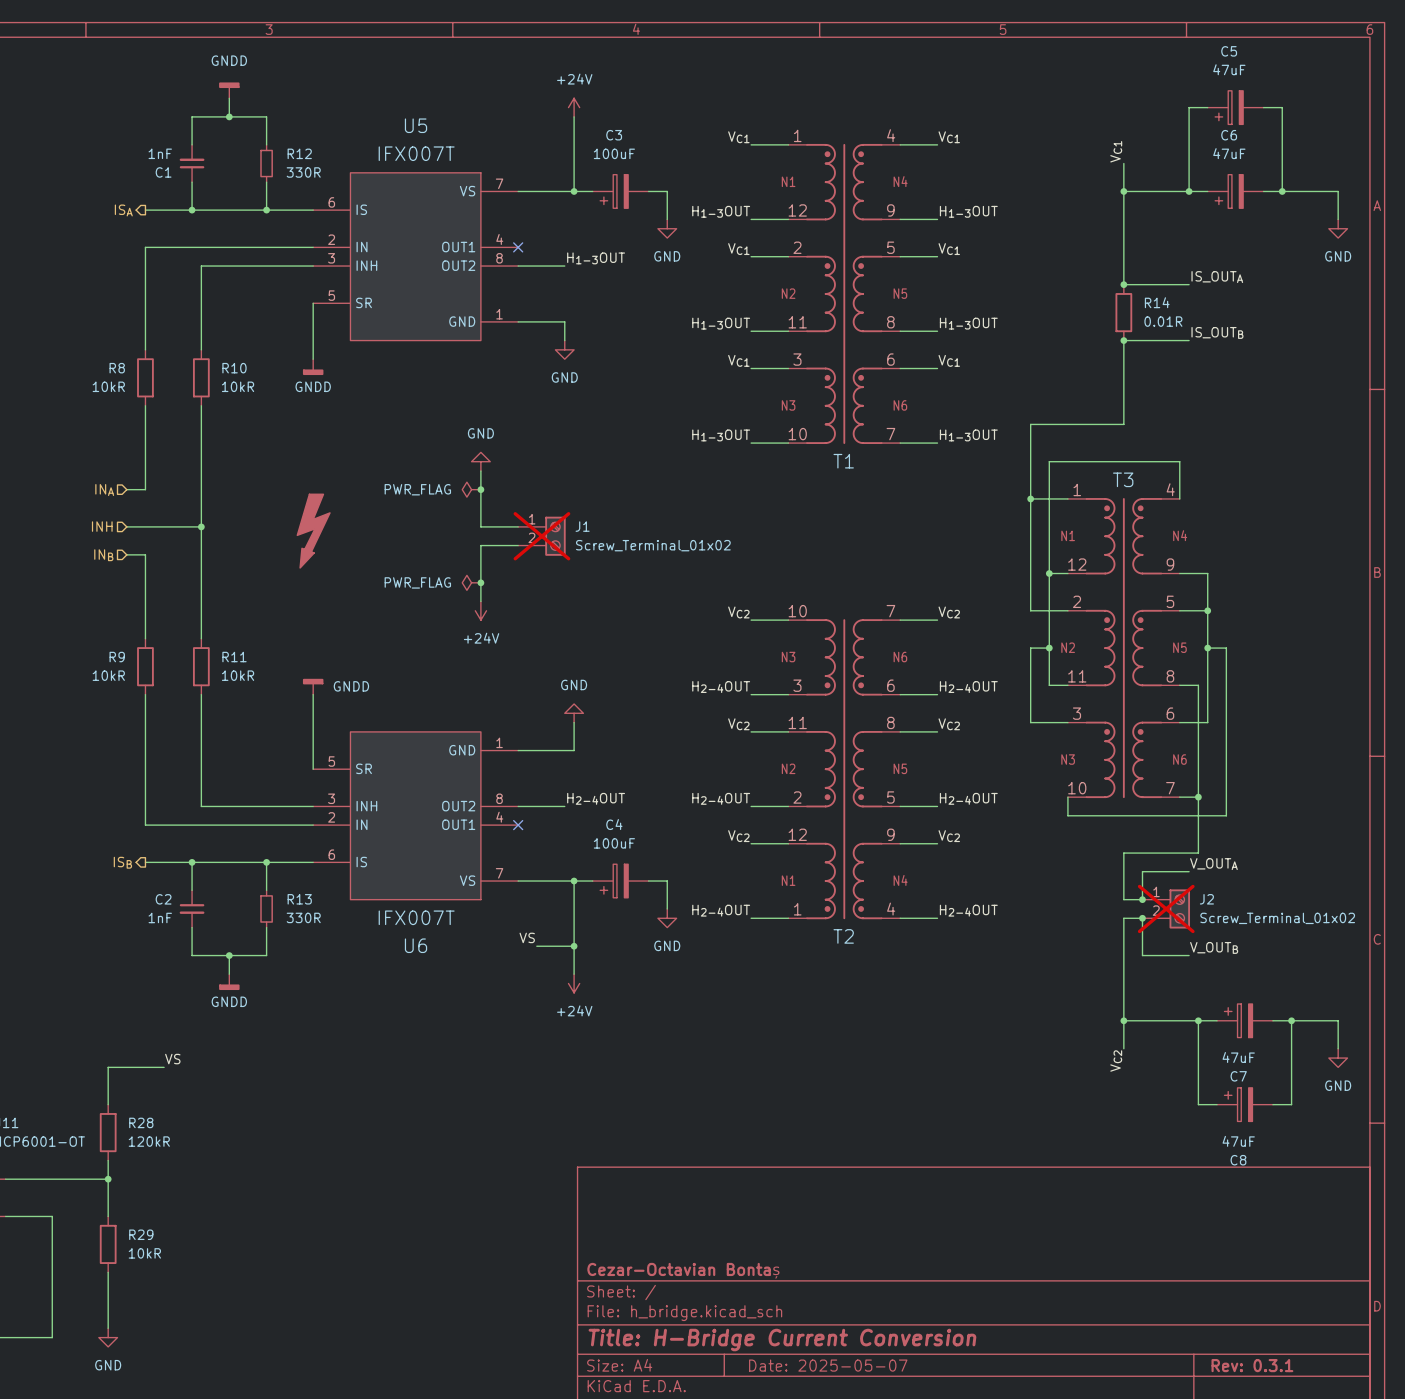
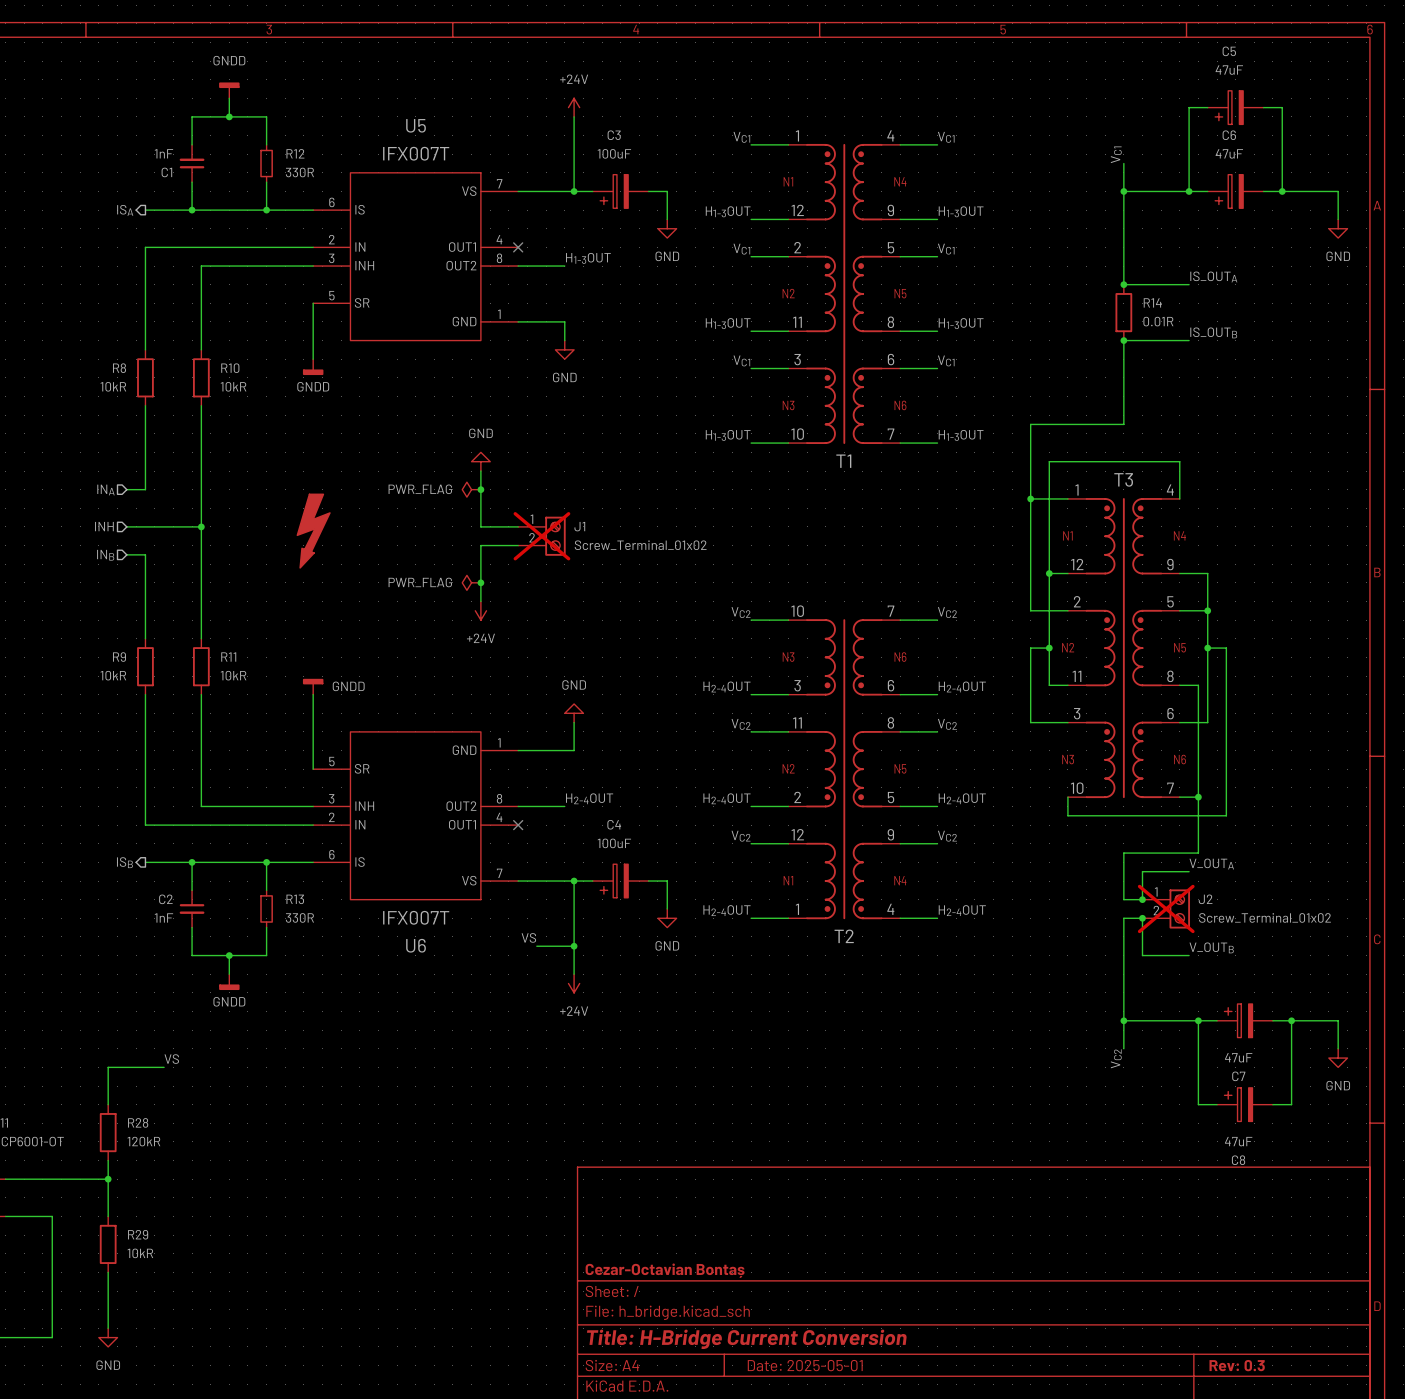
title block: Date: 2025-05-07 (828, 1365) -> Date: 2025-05-01 (805, 1365)
title block: Rev: 0.3.1 (1252, 1365) -> Rev: 0.3 (1237, 1365)

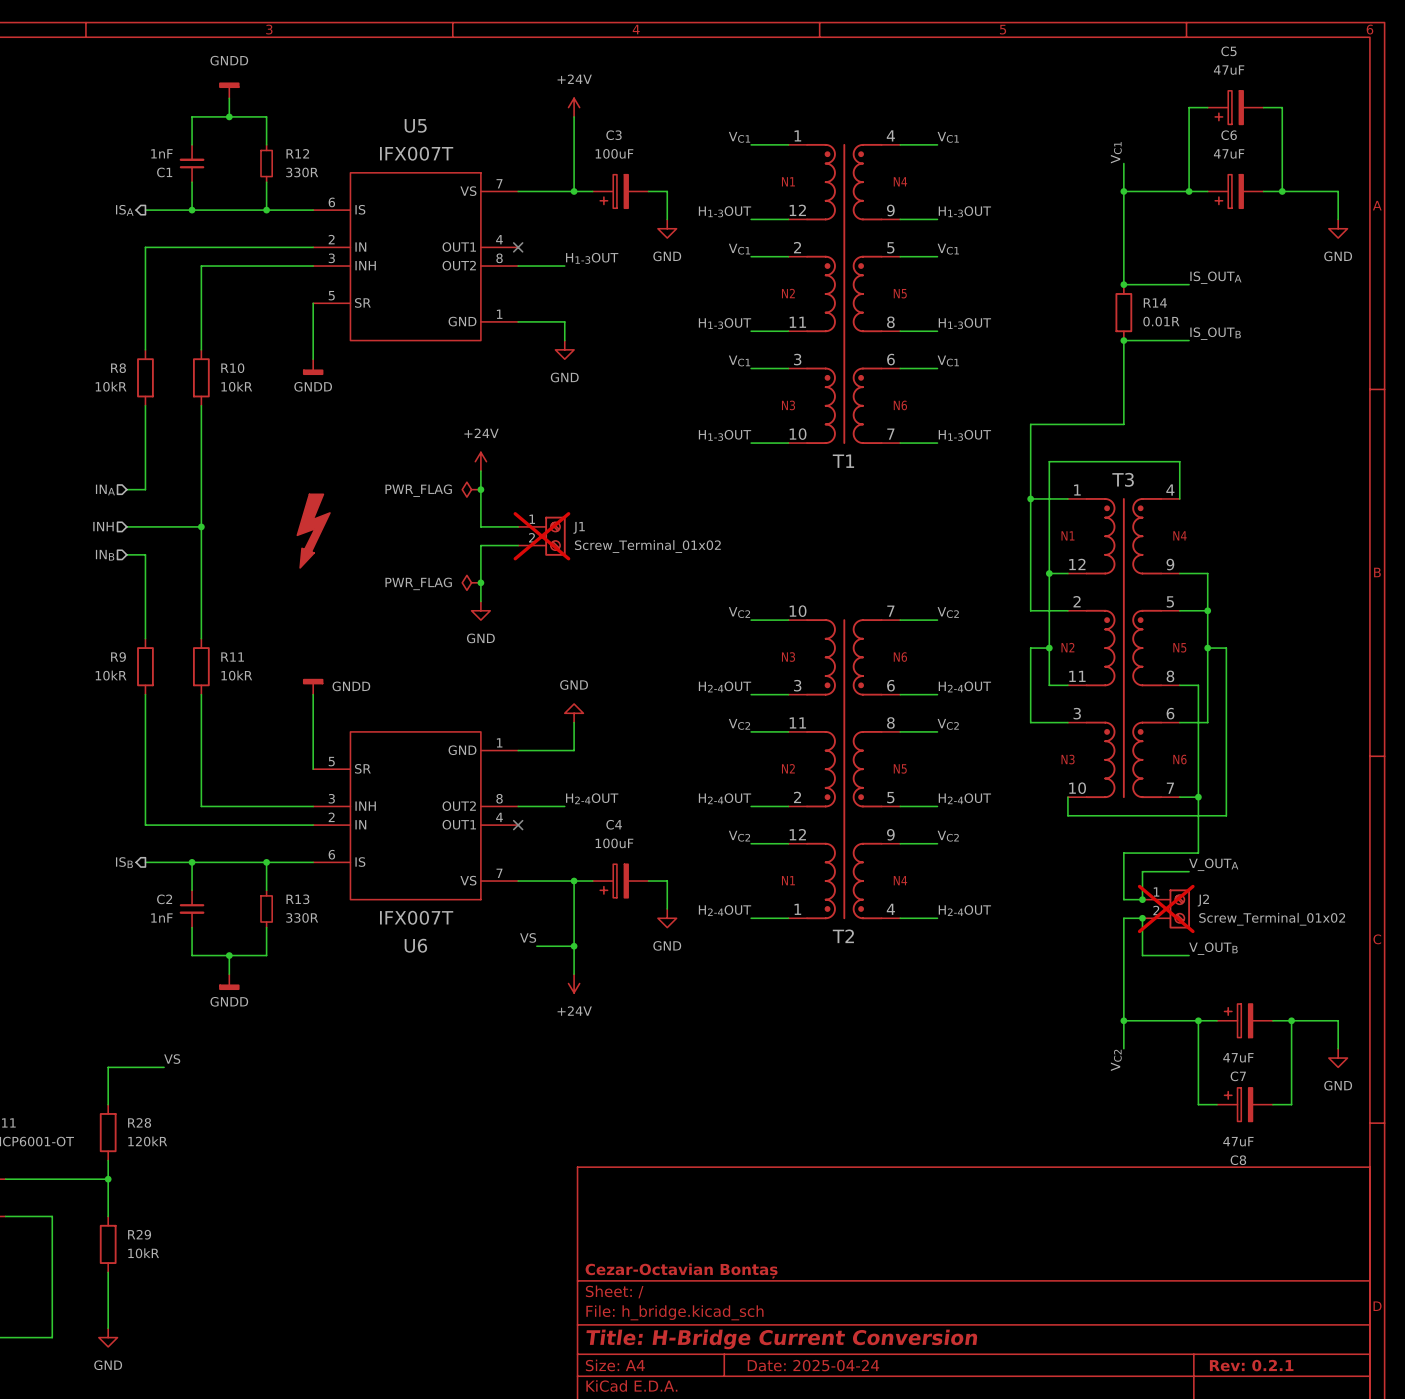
power symbol: GND (480, 461) -> +24V (480, 461)
power symbol: +24V (480, 610) -> GND (480, 610)
title block: Date: 2025-05-01 (805, 1365) -> Date: 2025-04-24 (813, 1365)
title block: Rev: 0.3 (1237, 1365) -> Rev: 0.2.1 (1251, 1365)

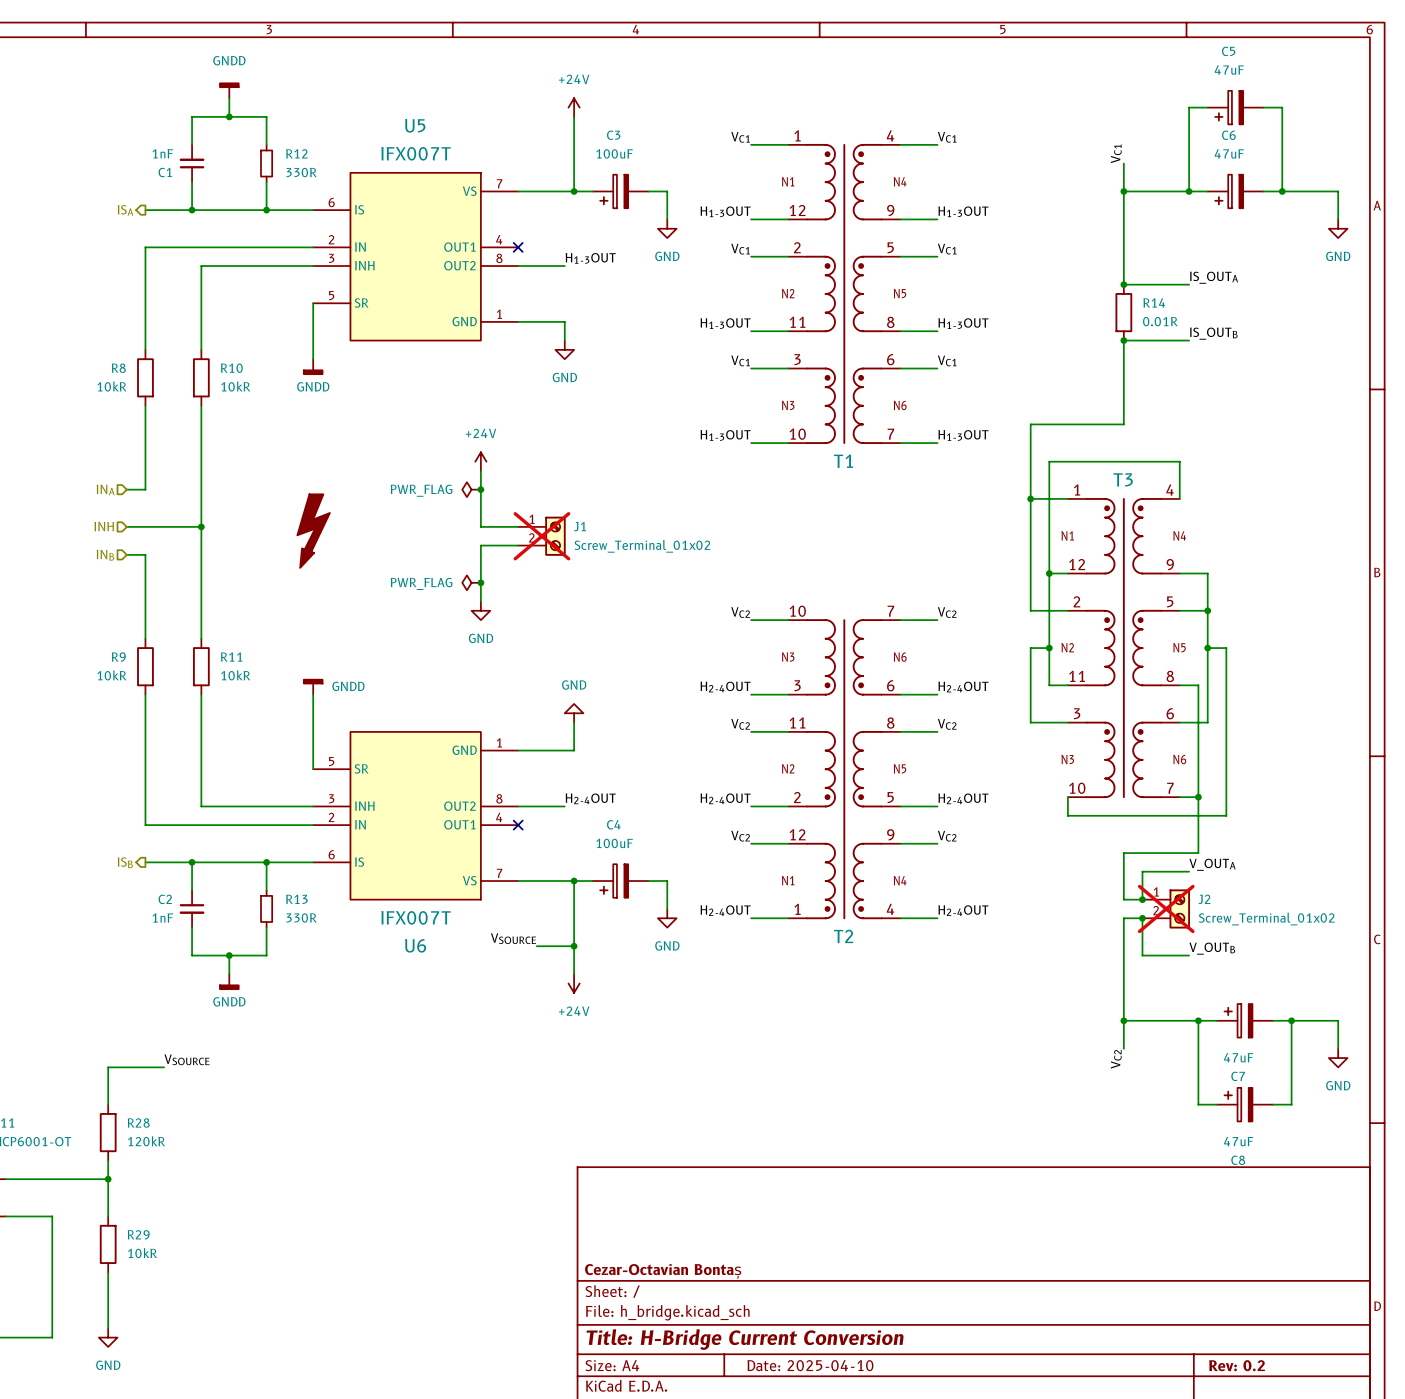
label: VS (528, 937) -> VSOURCE (513, 938)
label: VS (172, 1059) -> VSOURCE (187, 1059)
title block: Date: 2025-04-24 (813, 1365) -> Date: 2025-04-10 (810, 1365)
title block: Rev: 0.2.1 (1251, 1365) -> Rev: 0.2 (1237, 1365)

